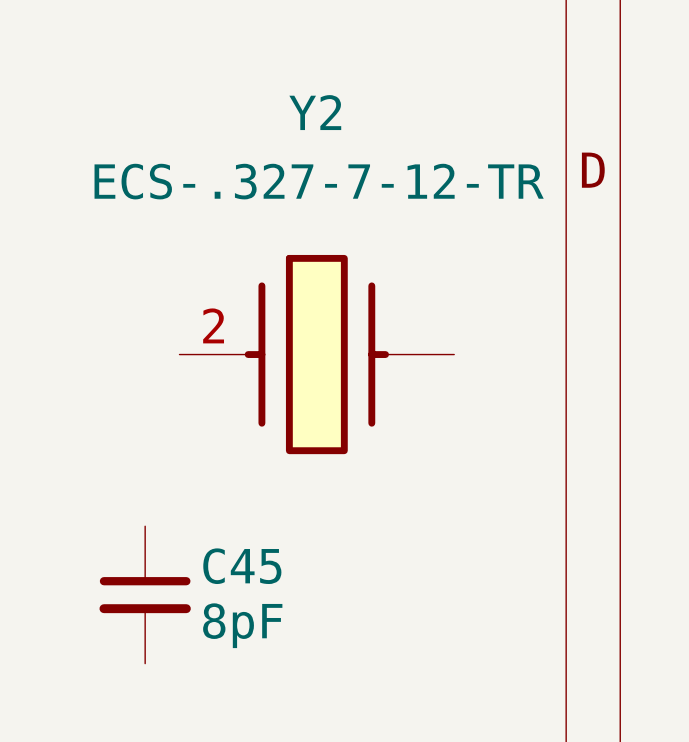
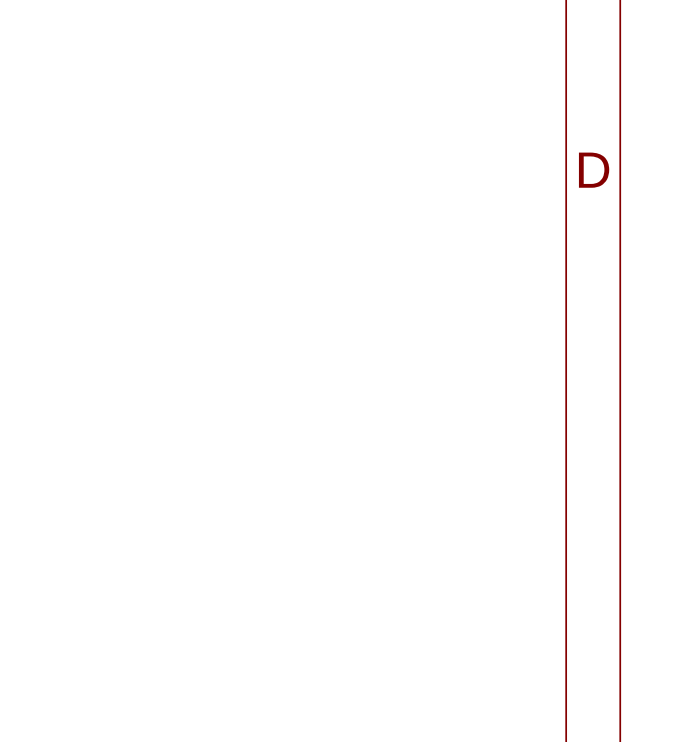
Y2: ECS-.327-7-12-TR (316, 354) -> none
C45: 8pF (145, 594) -> none

